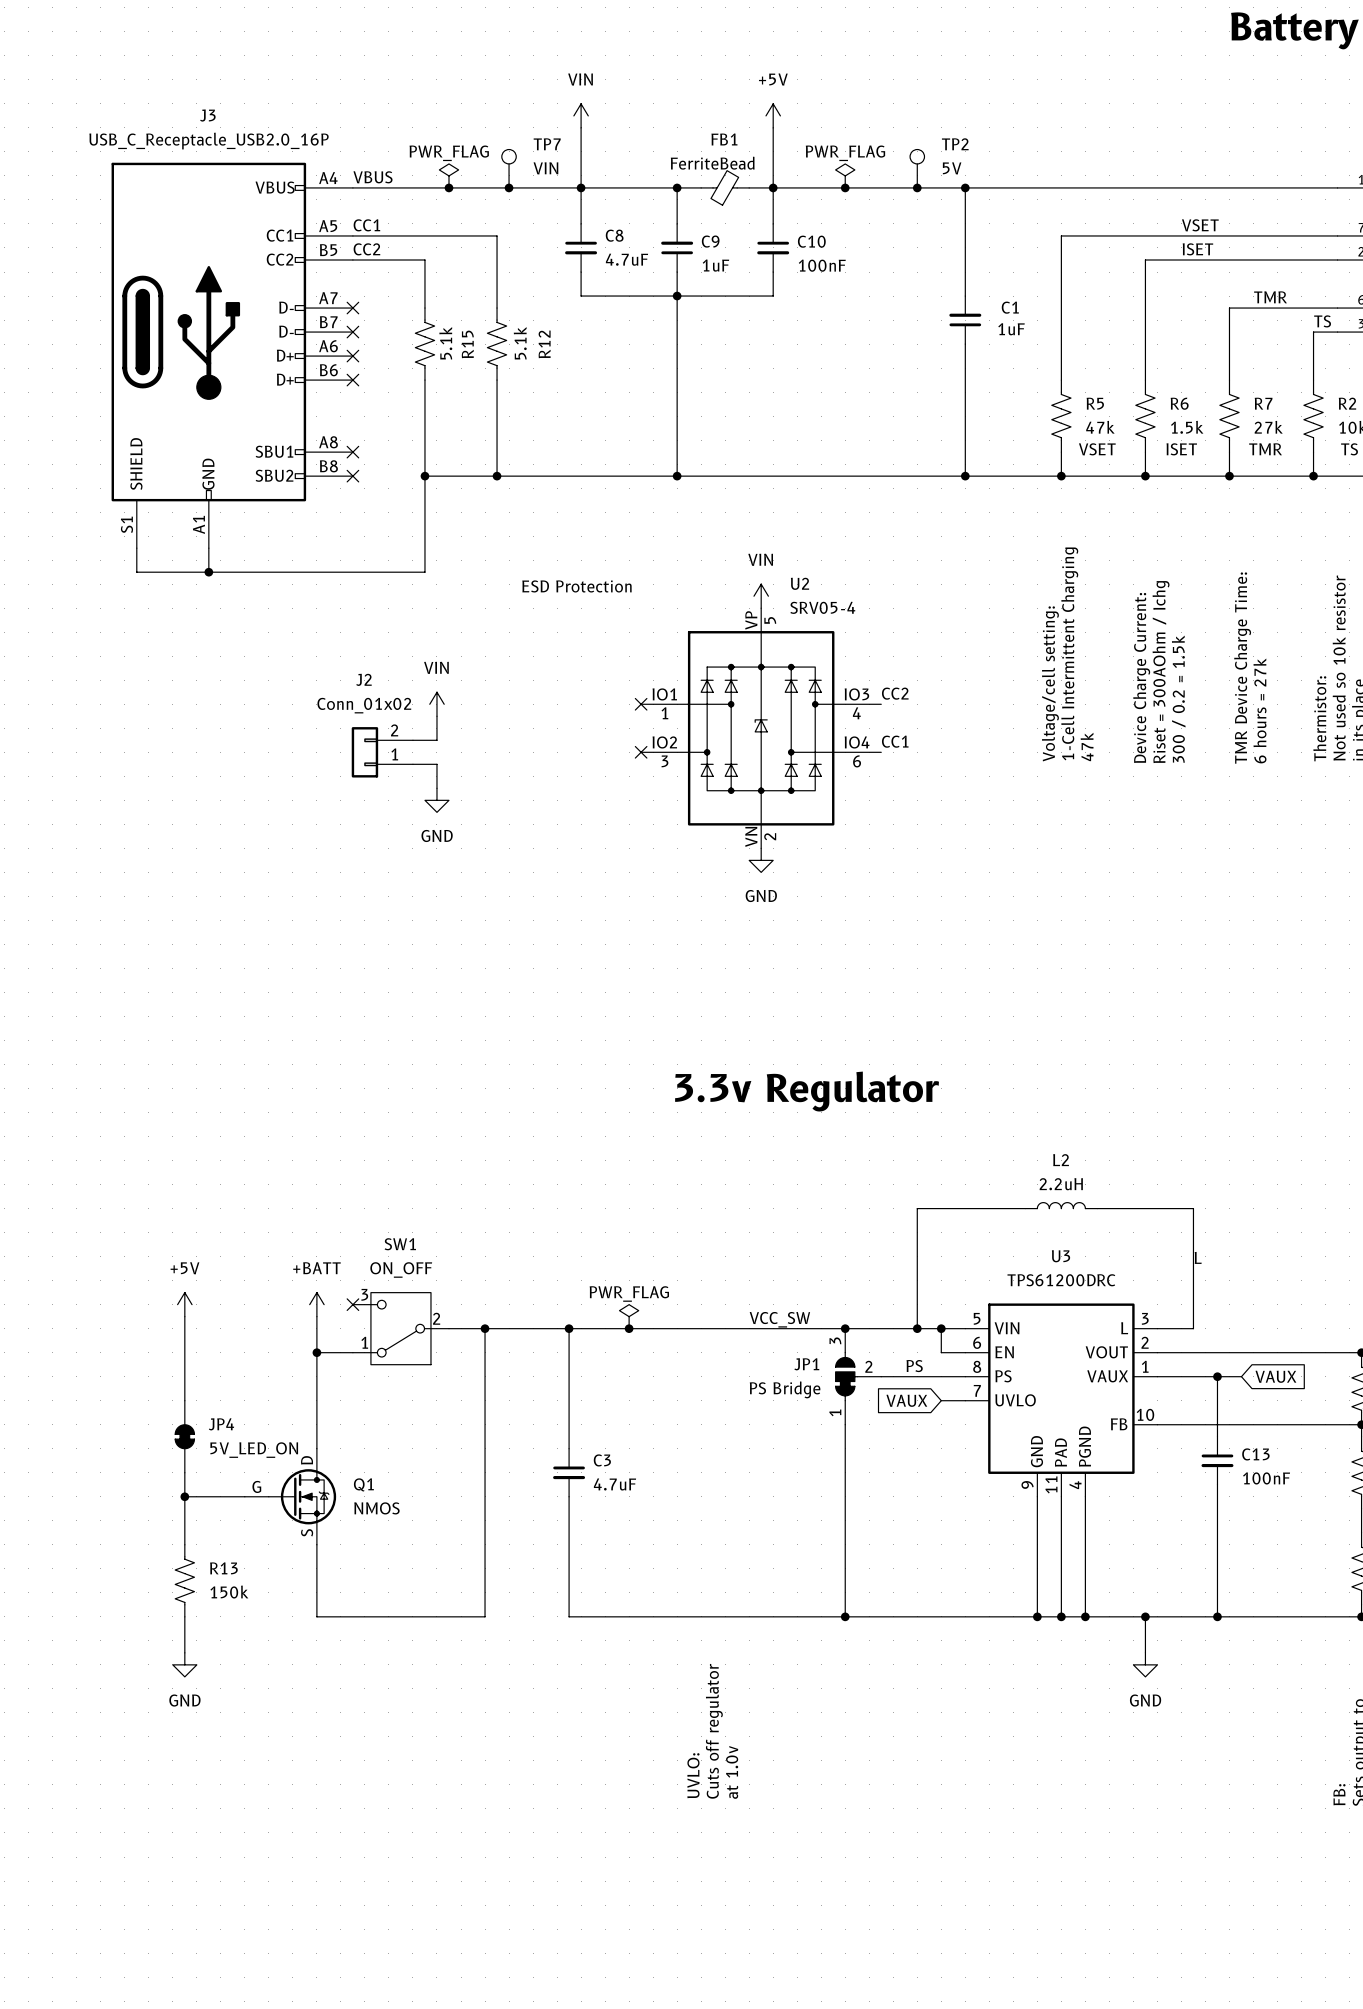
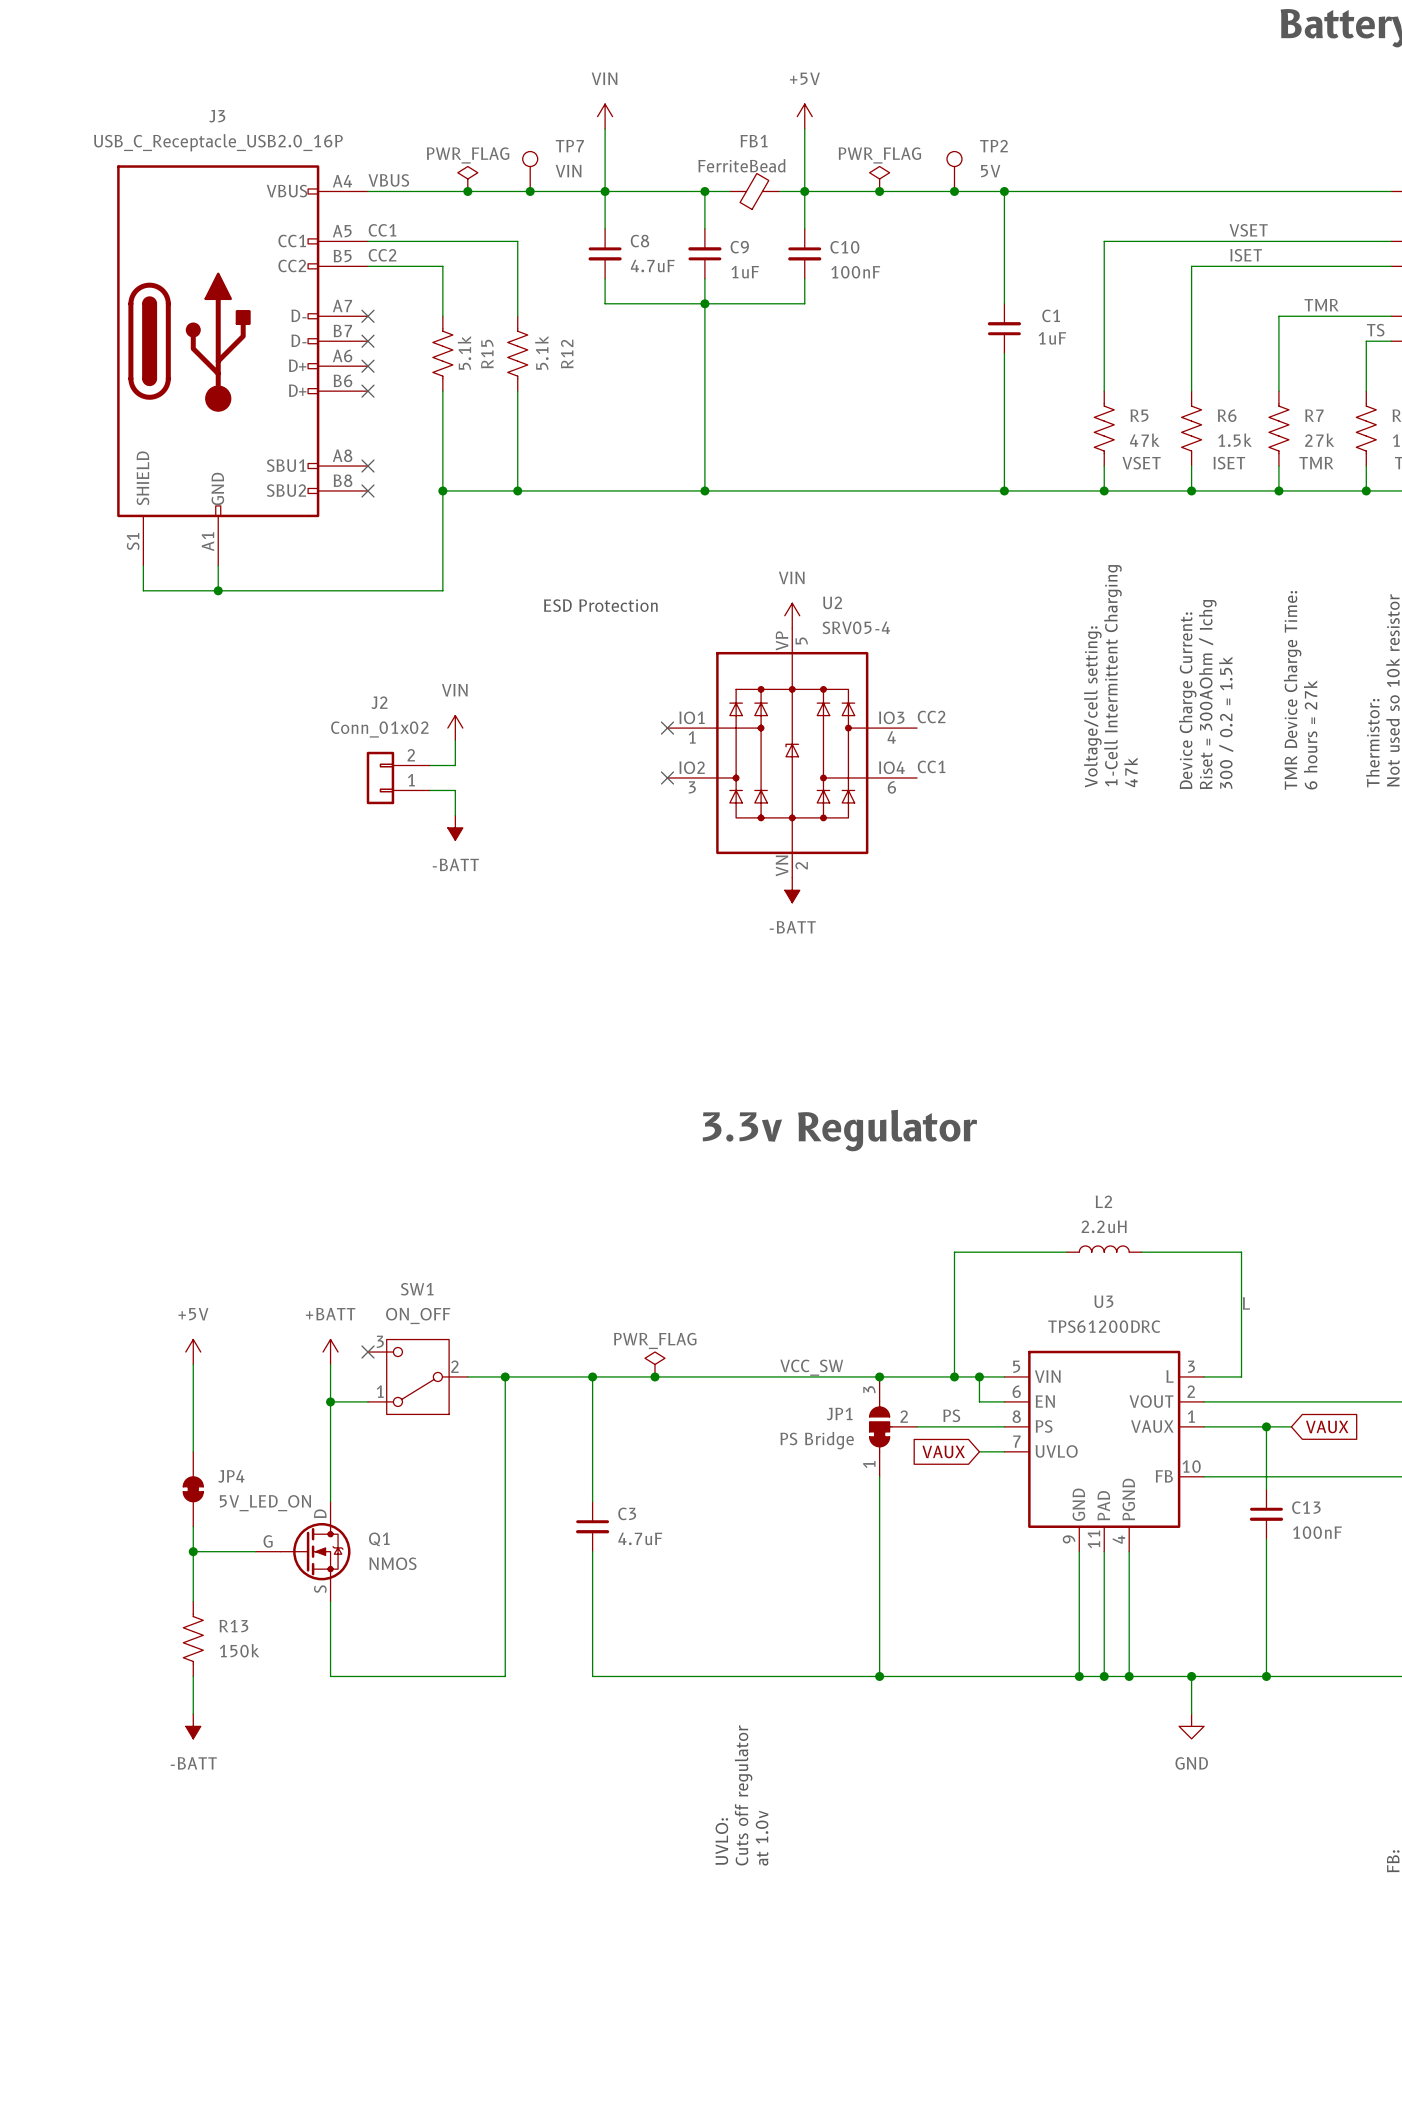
power symbol: GND (436, 800) -> -BATT (455, 827)
power symbol: GND (761, 860) -> -BATT (792, 890)
power symbol: GND (184, 1664) -> -BATT (193, 1726)

